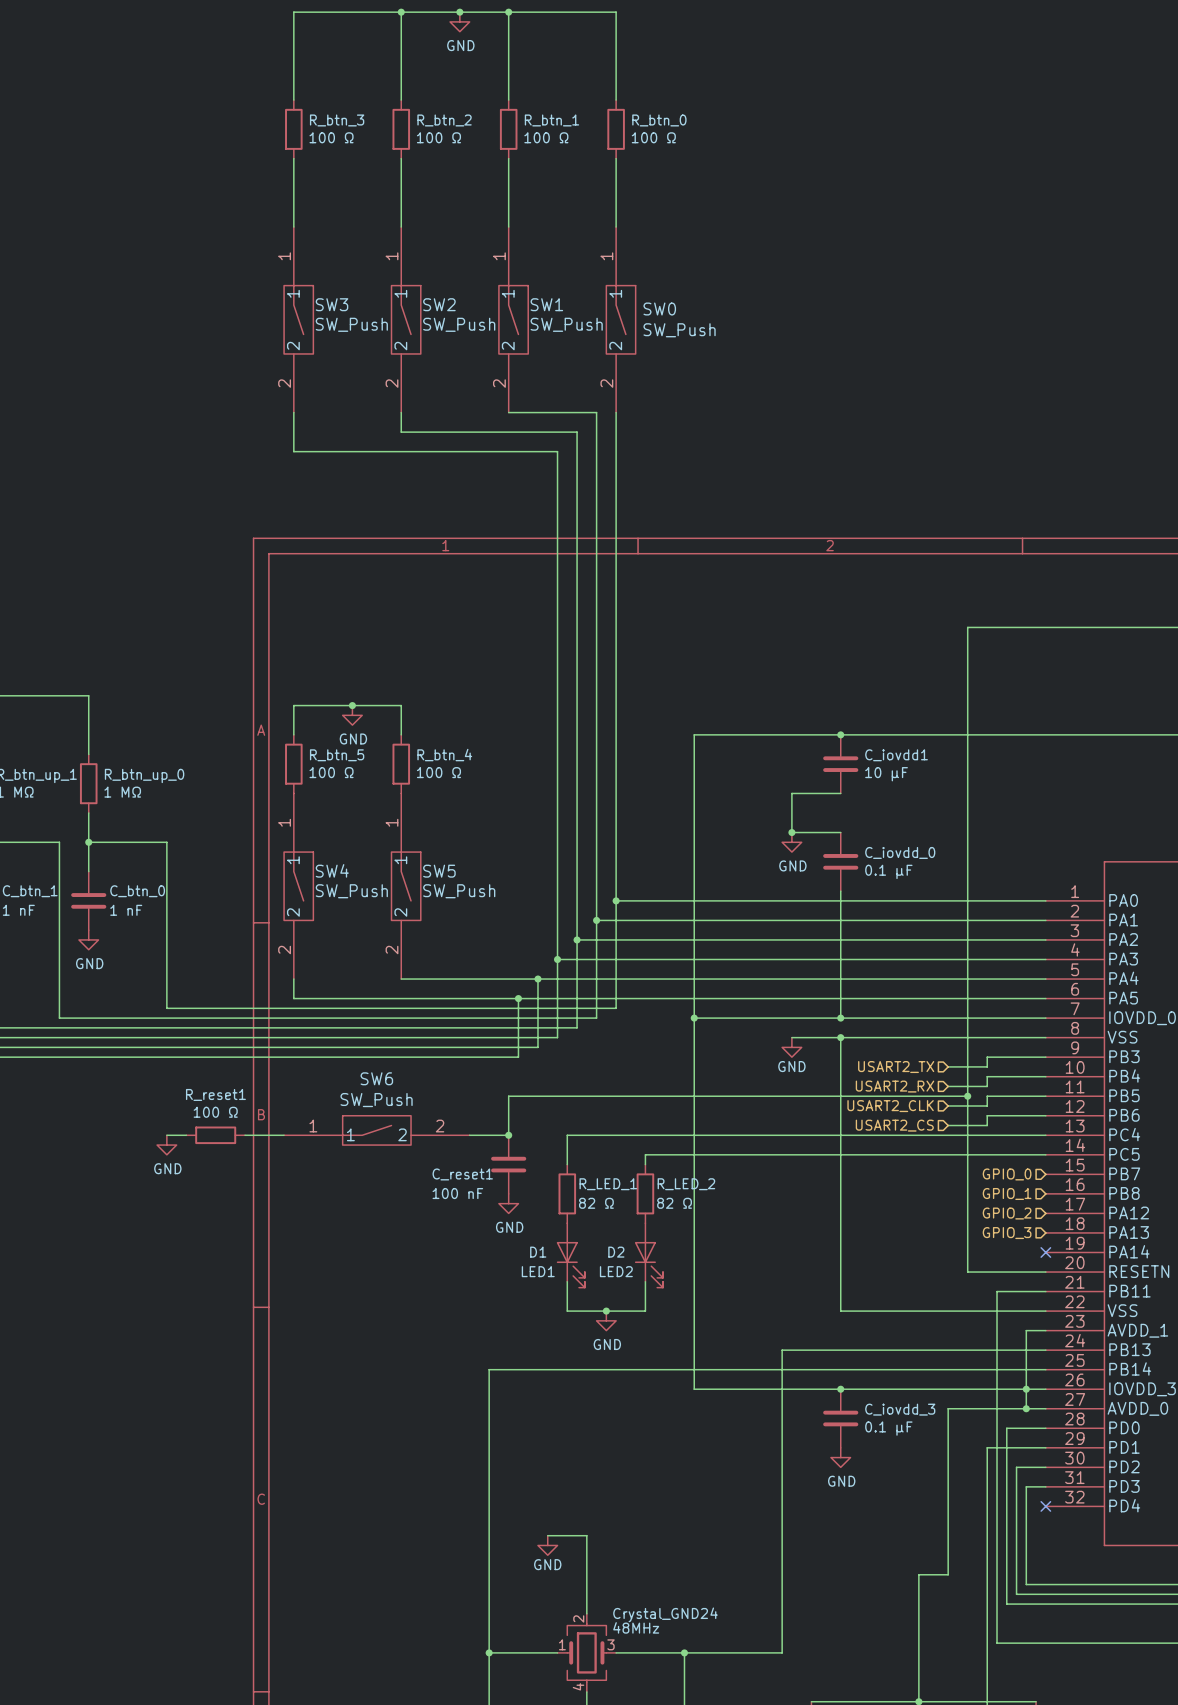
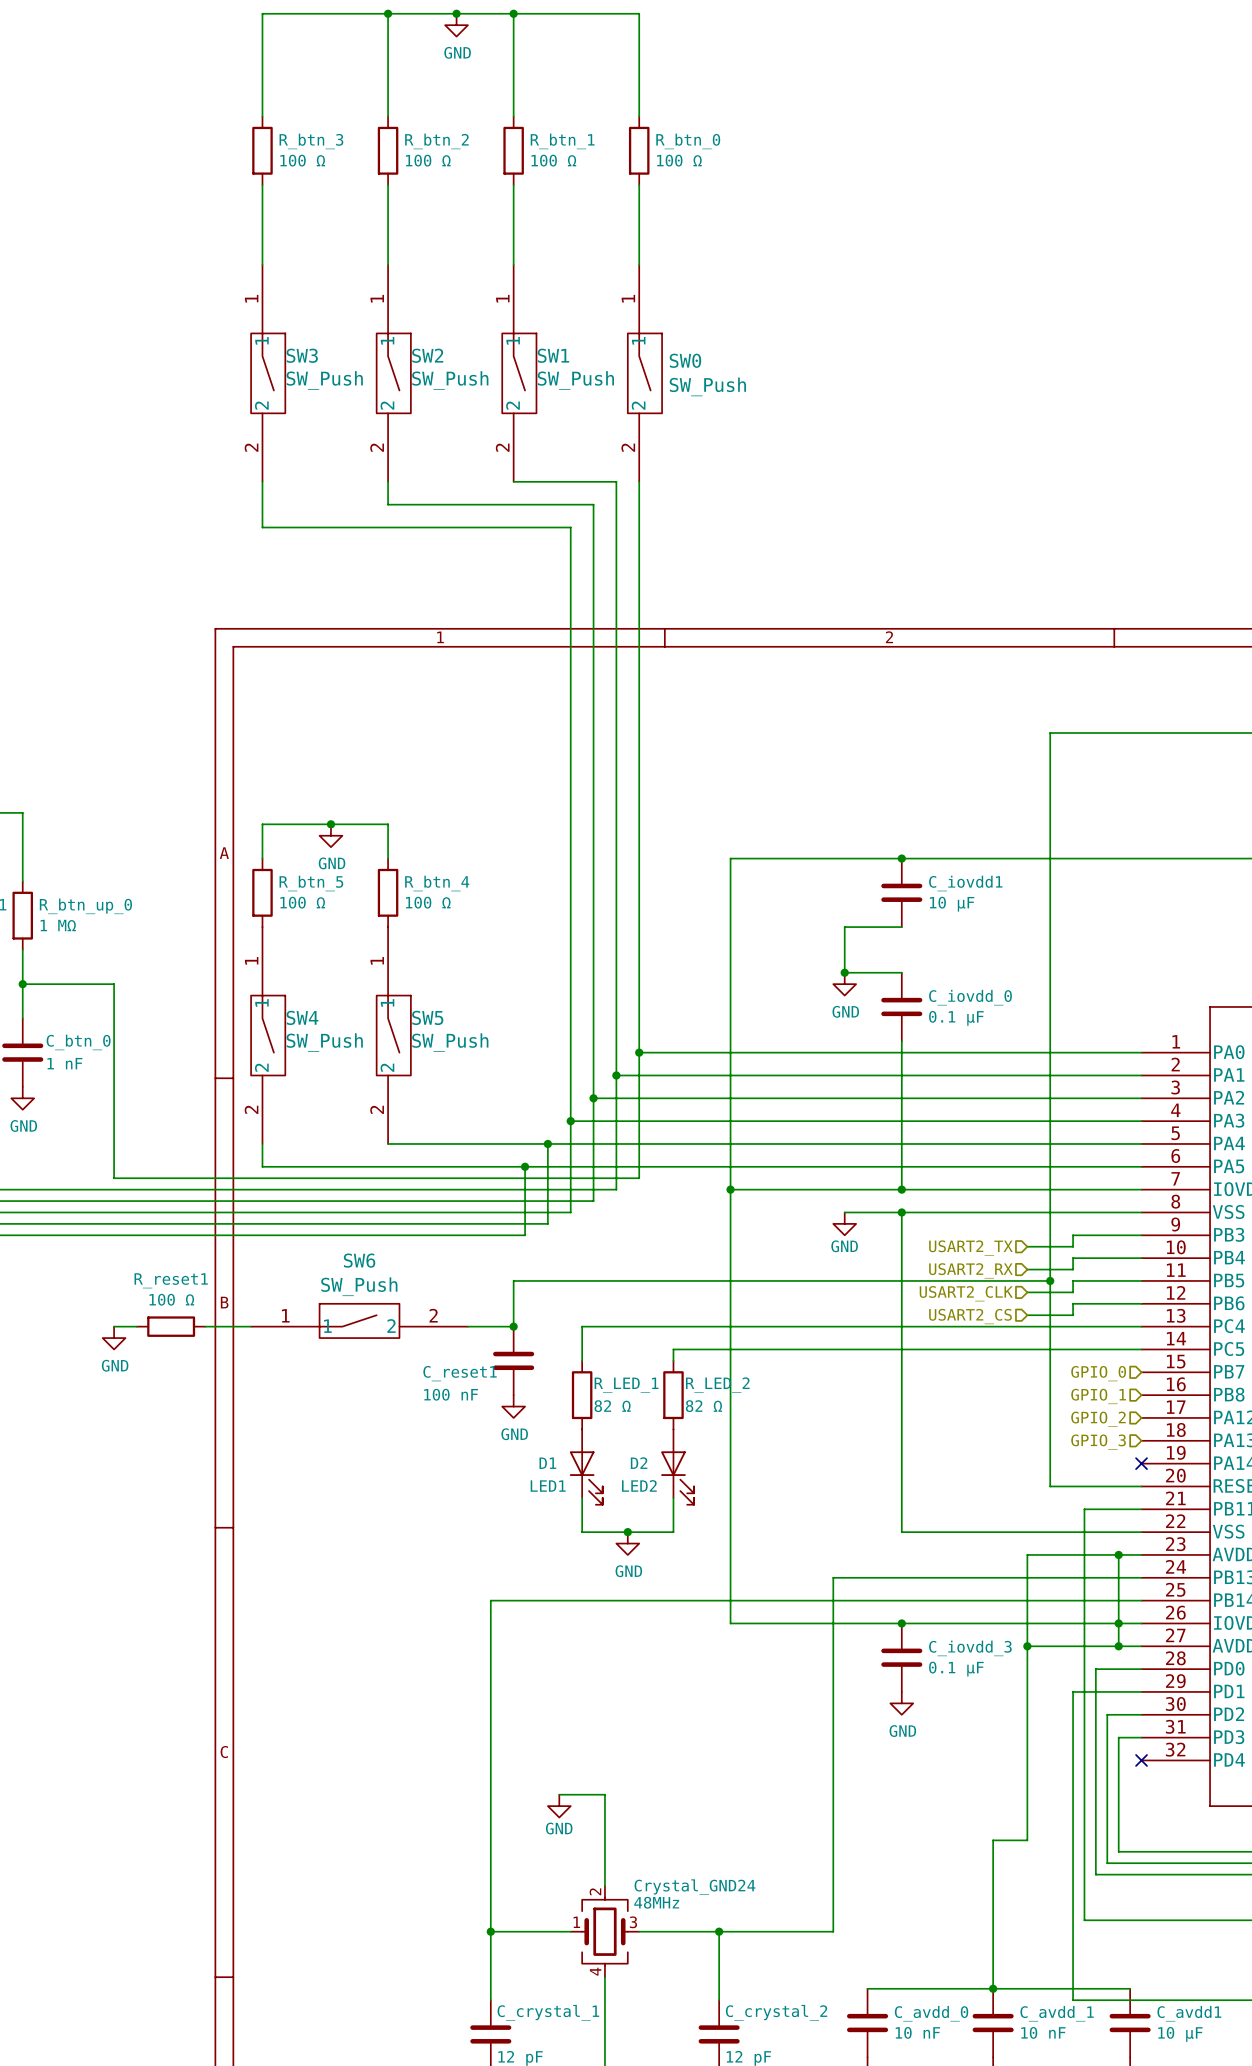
wire: none -> (1118, 1554) (1027, 1554) (1027, 1646)
junction: none -> (1118, 1554)
junction: none -> (1027, 1646)

